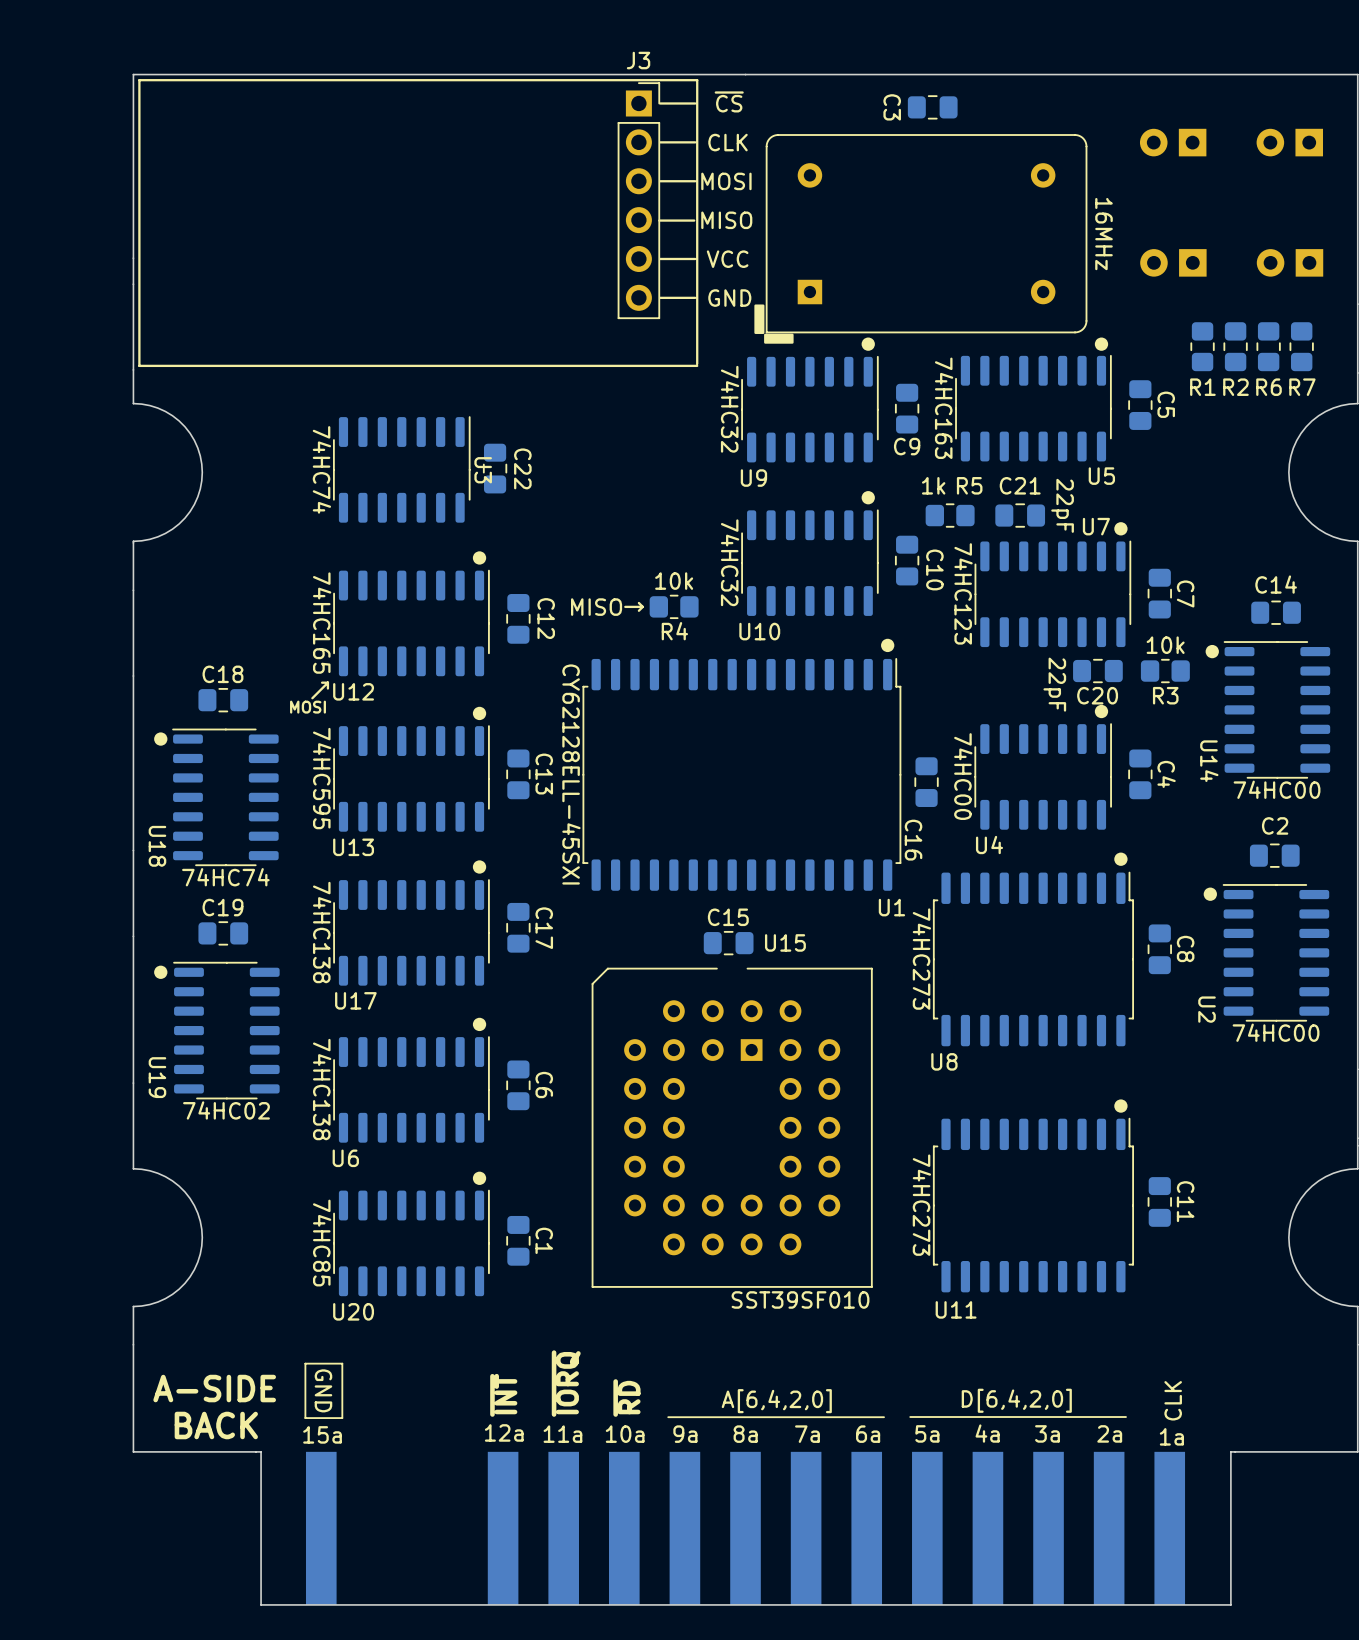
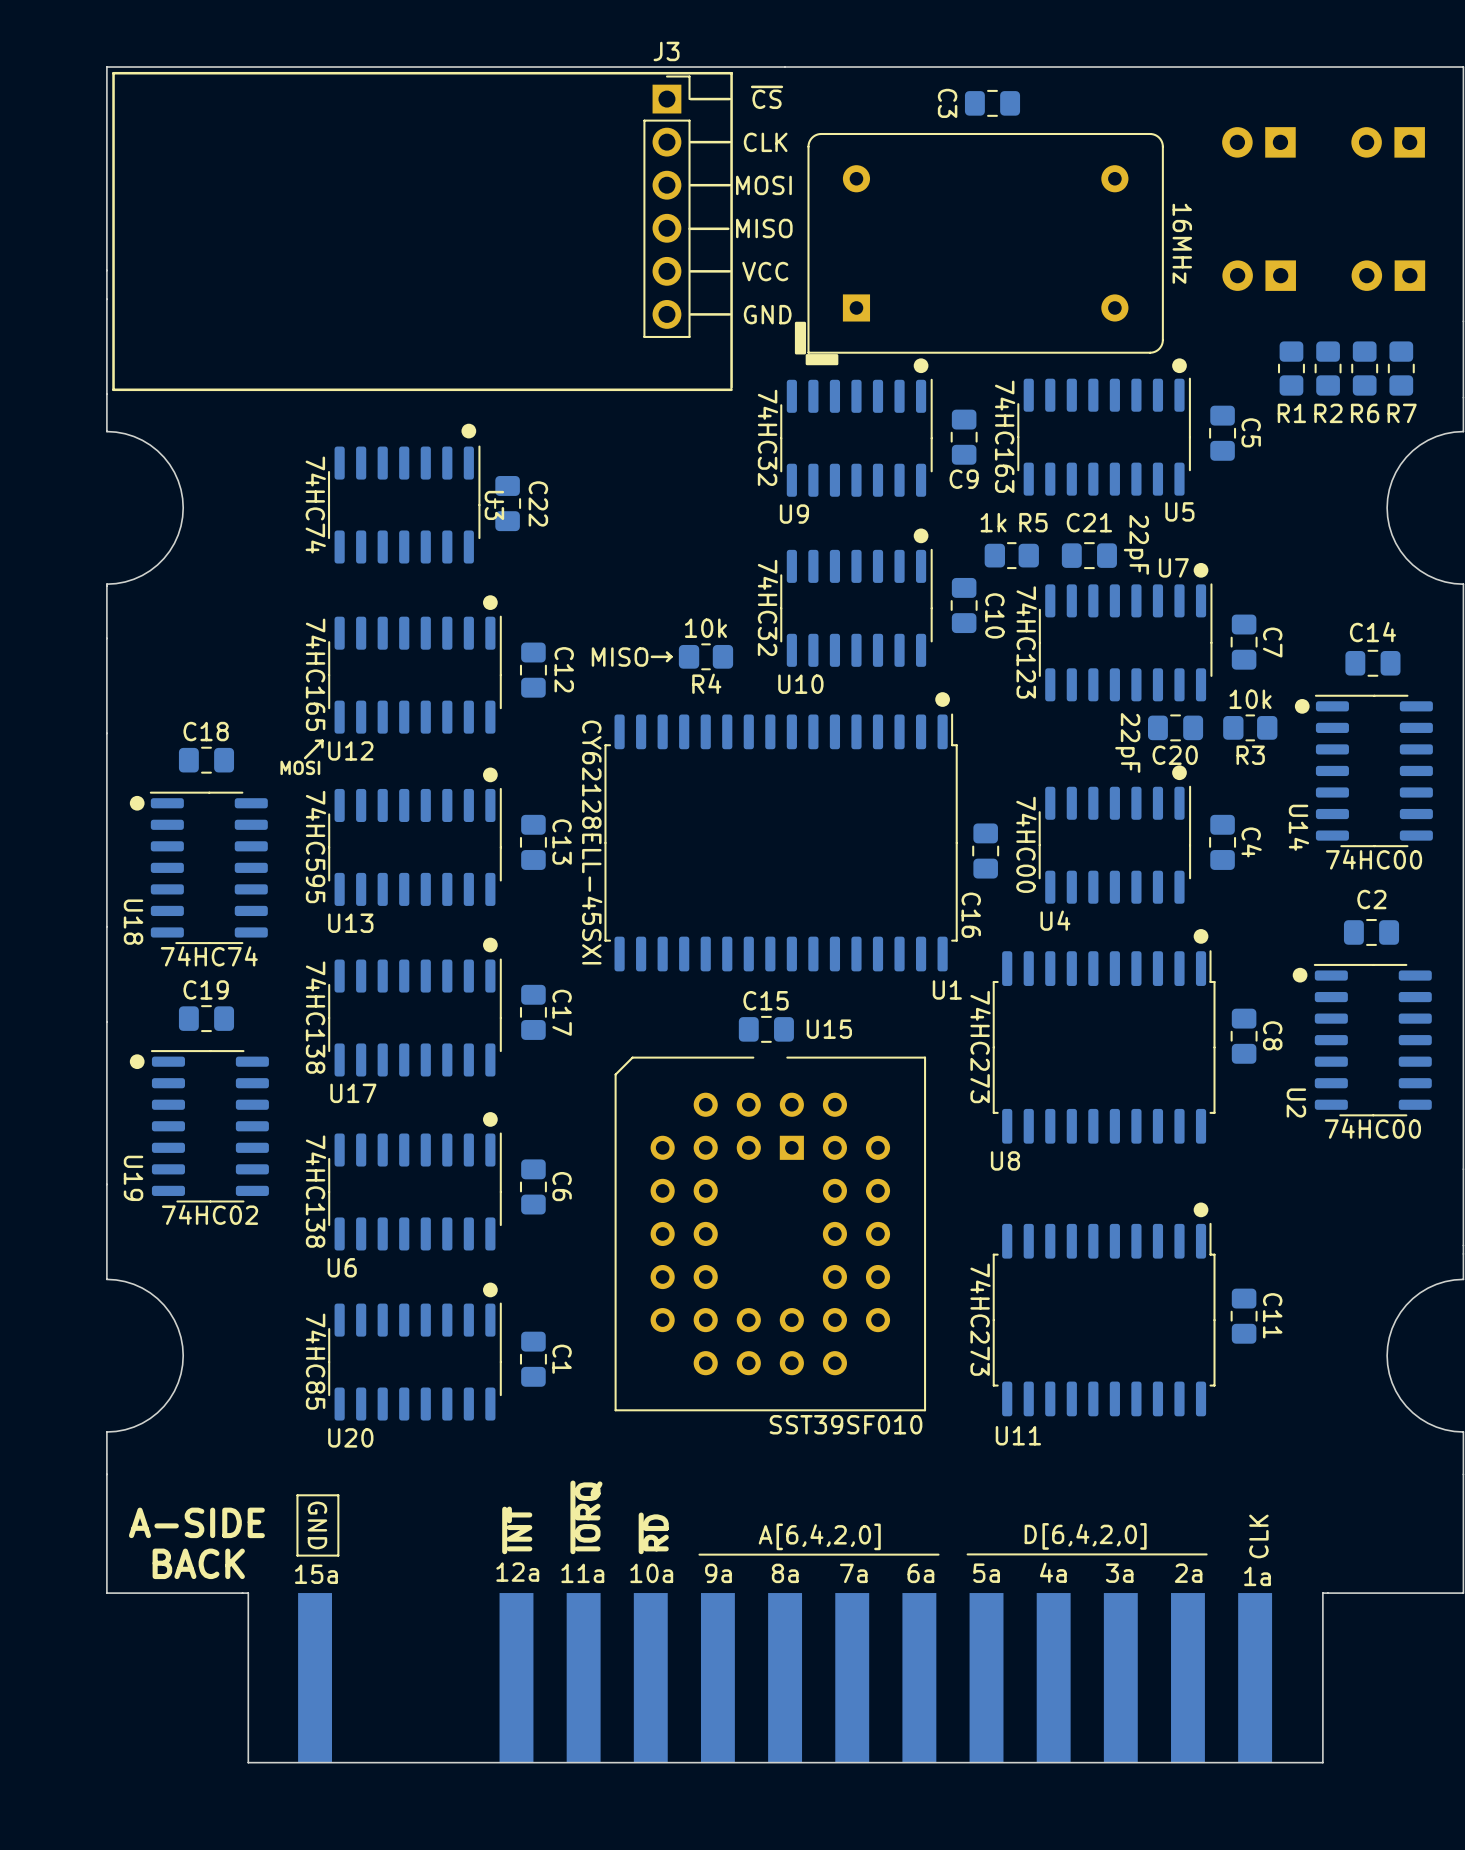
drawing: none -> [461, 423, 477, 439]

